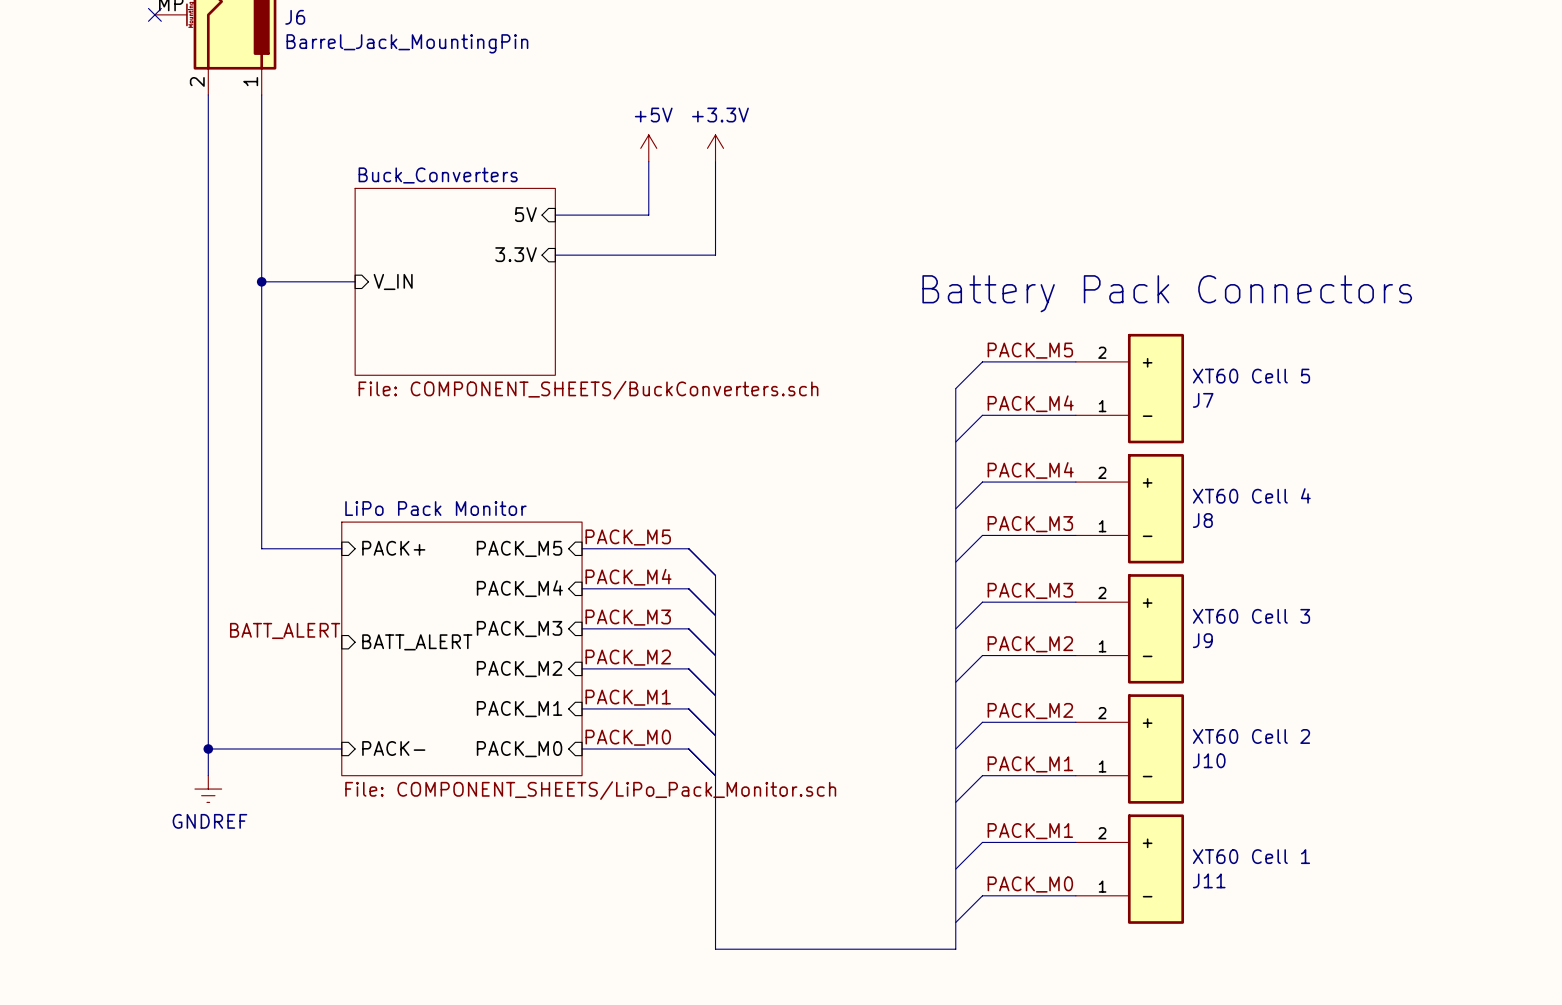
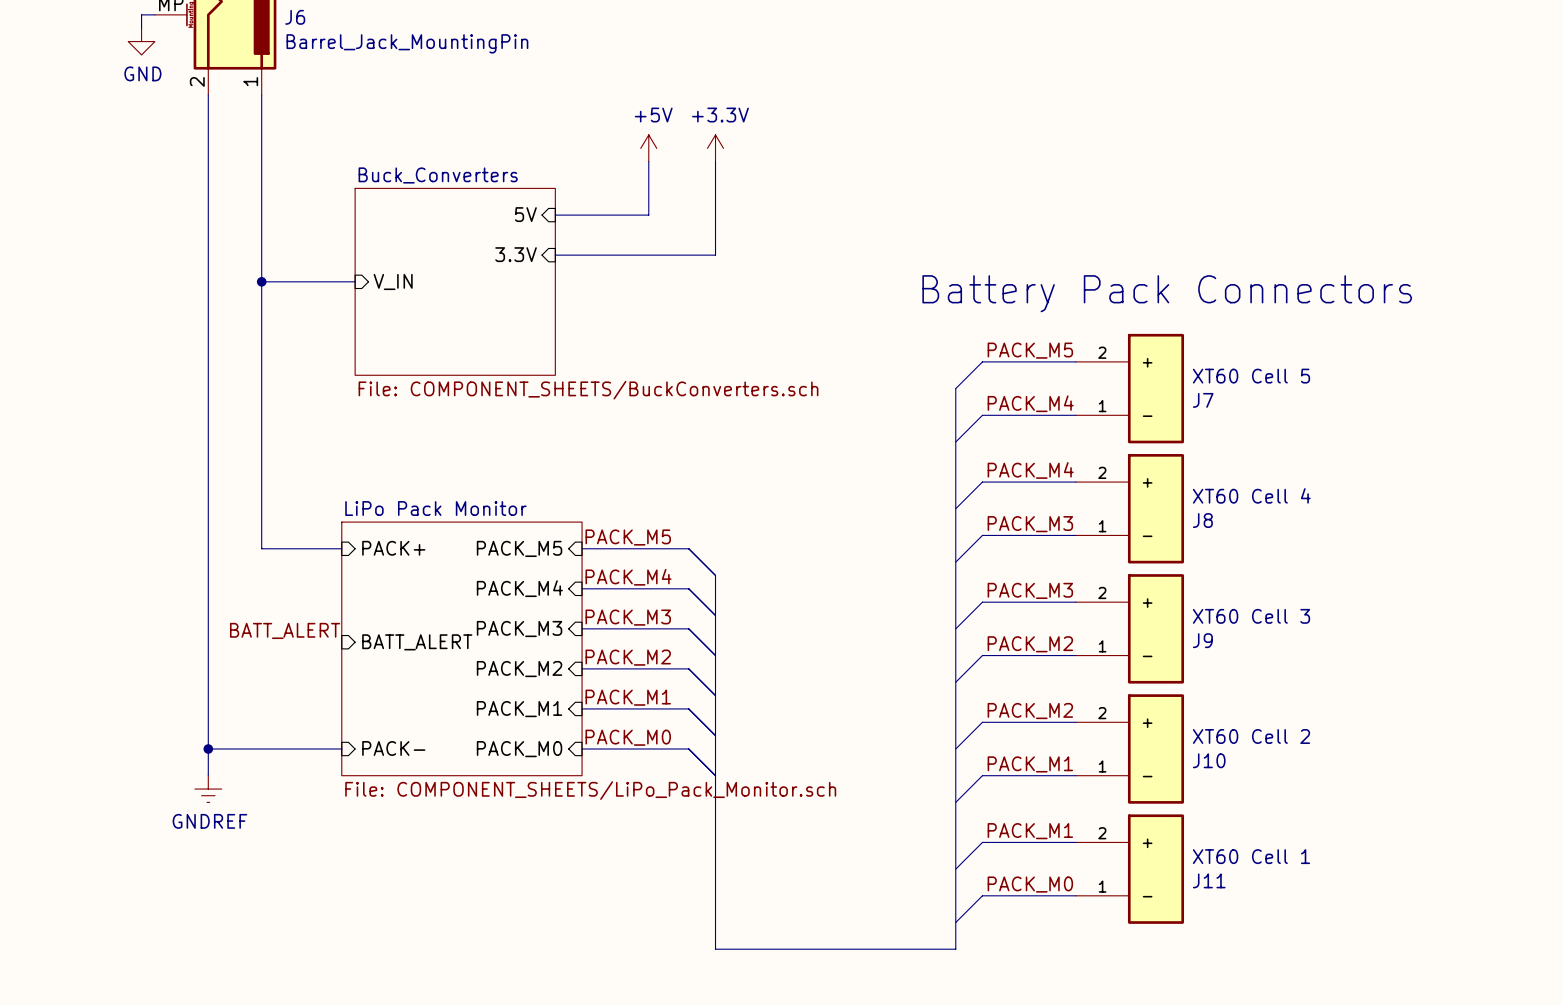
wire: none -> (154, 14) (141, 14) (141, 28)
no-connect mark: (154, 14) -> none
power symbol: none -> GND (141, 41)

